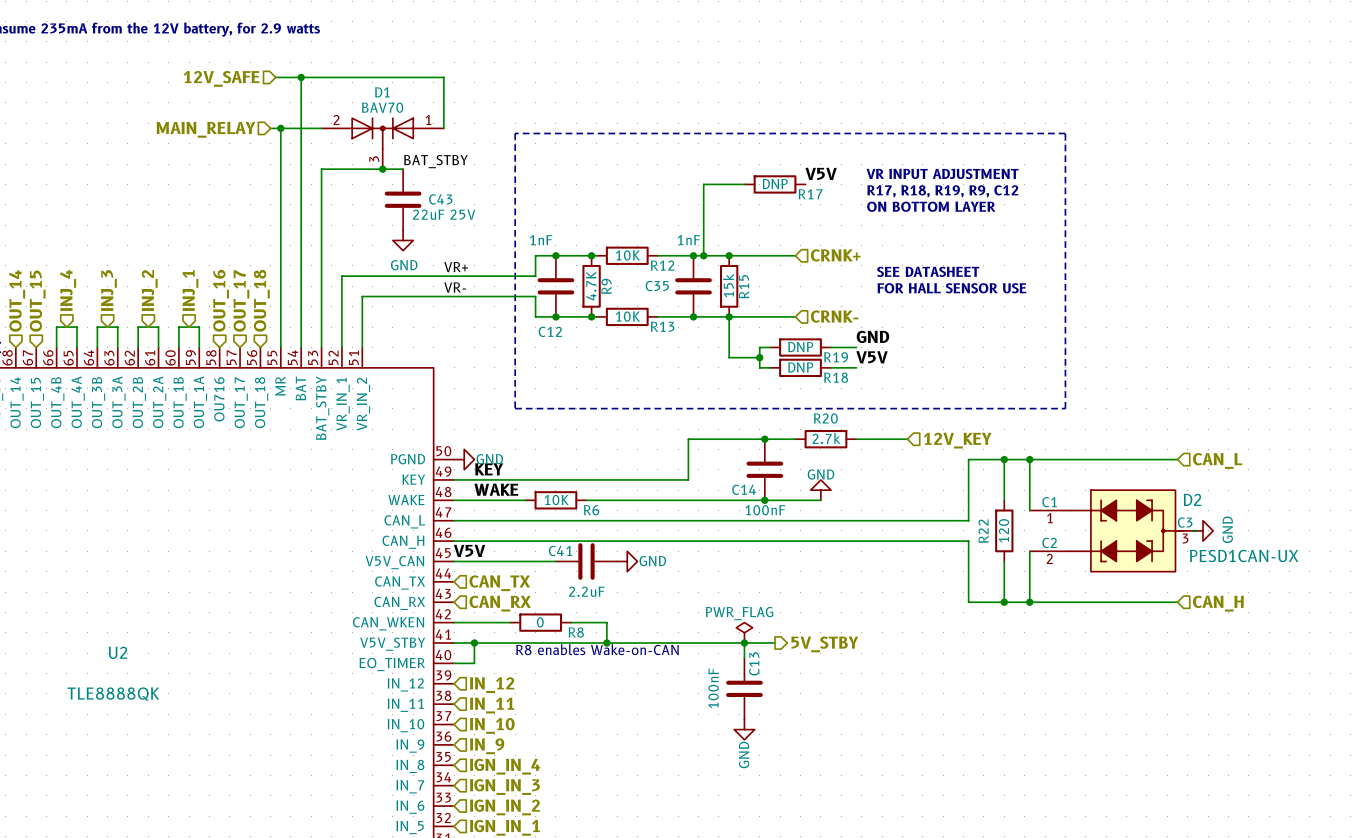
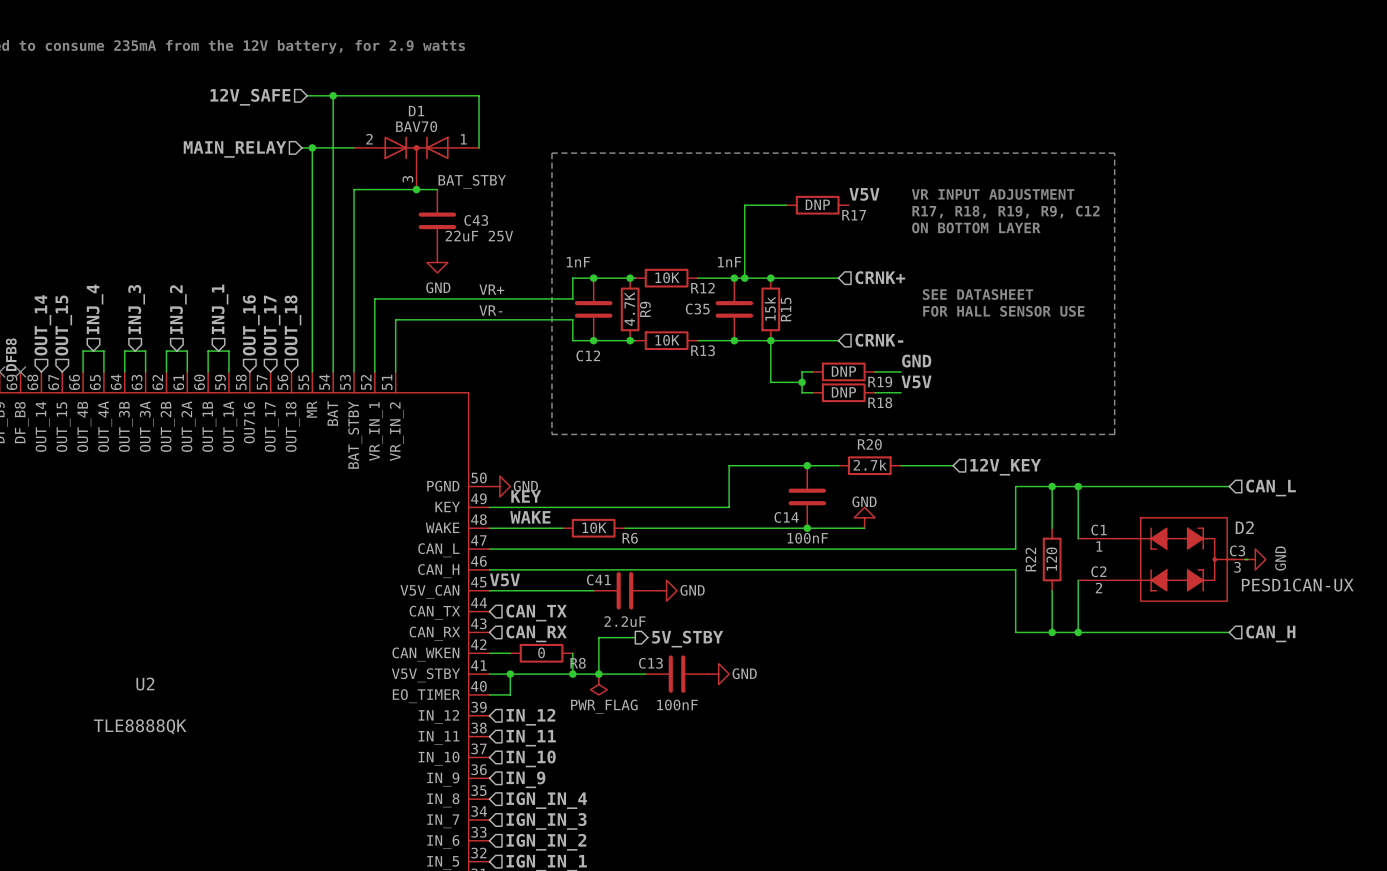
wire: none -> (635, 637) (598, 637) (598, 674)
wire: (474, 622) (510, 622) -> none
wire: none -> (572, 653) (572, 674)
R8 position: (540, 622) -> (541, 653)
wire: (571, 622) (606, 622) (606, 642) (775, 642) -> none
power symbol rotation: 0° (744, 632) -> 180° (598, 684)
power symbol position: PWR_FLAG (744, 632) -> PWR_FLAG (598, 684)
junction: none -> (572, 674)
junction: none -> (598, 674)
junction: (606, 642) -> none
wire: (744, 642) (744, 658) -> none
junction: (744, 642) -> none
hierarchical label position: 5V_STBY (824, 644) -> 5V_STBY (687, 639)
text: R8 enables Wake-on-CAN (597, 649) -> none
C13 name position: C13 (754, 663) -> C13 (650, 663)
C13 value position: 100nF (713, 688) -> 100nF (677, 704)
C13 rotation: 0° (744, 688) -> 90° clockwise (677, 674)
C13 position: (744, 688) -> (677, 674)
power symbol rotation: 0° (744, 729) -> 90° counterclockwise (718, 674)
power symbol position: GND (744, 729) -> GND (718, 674)

